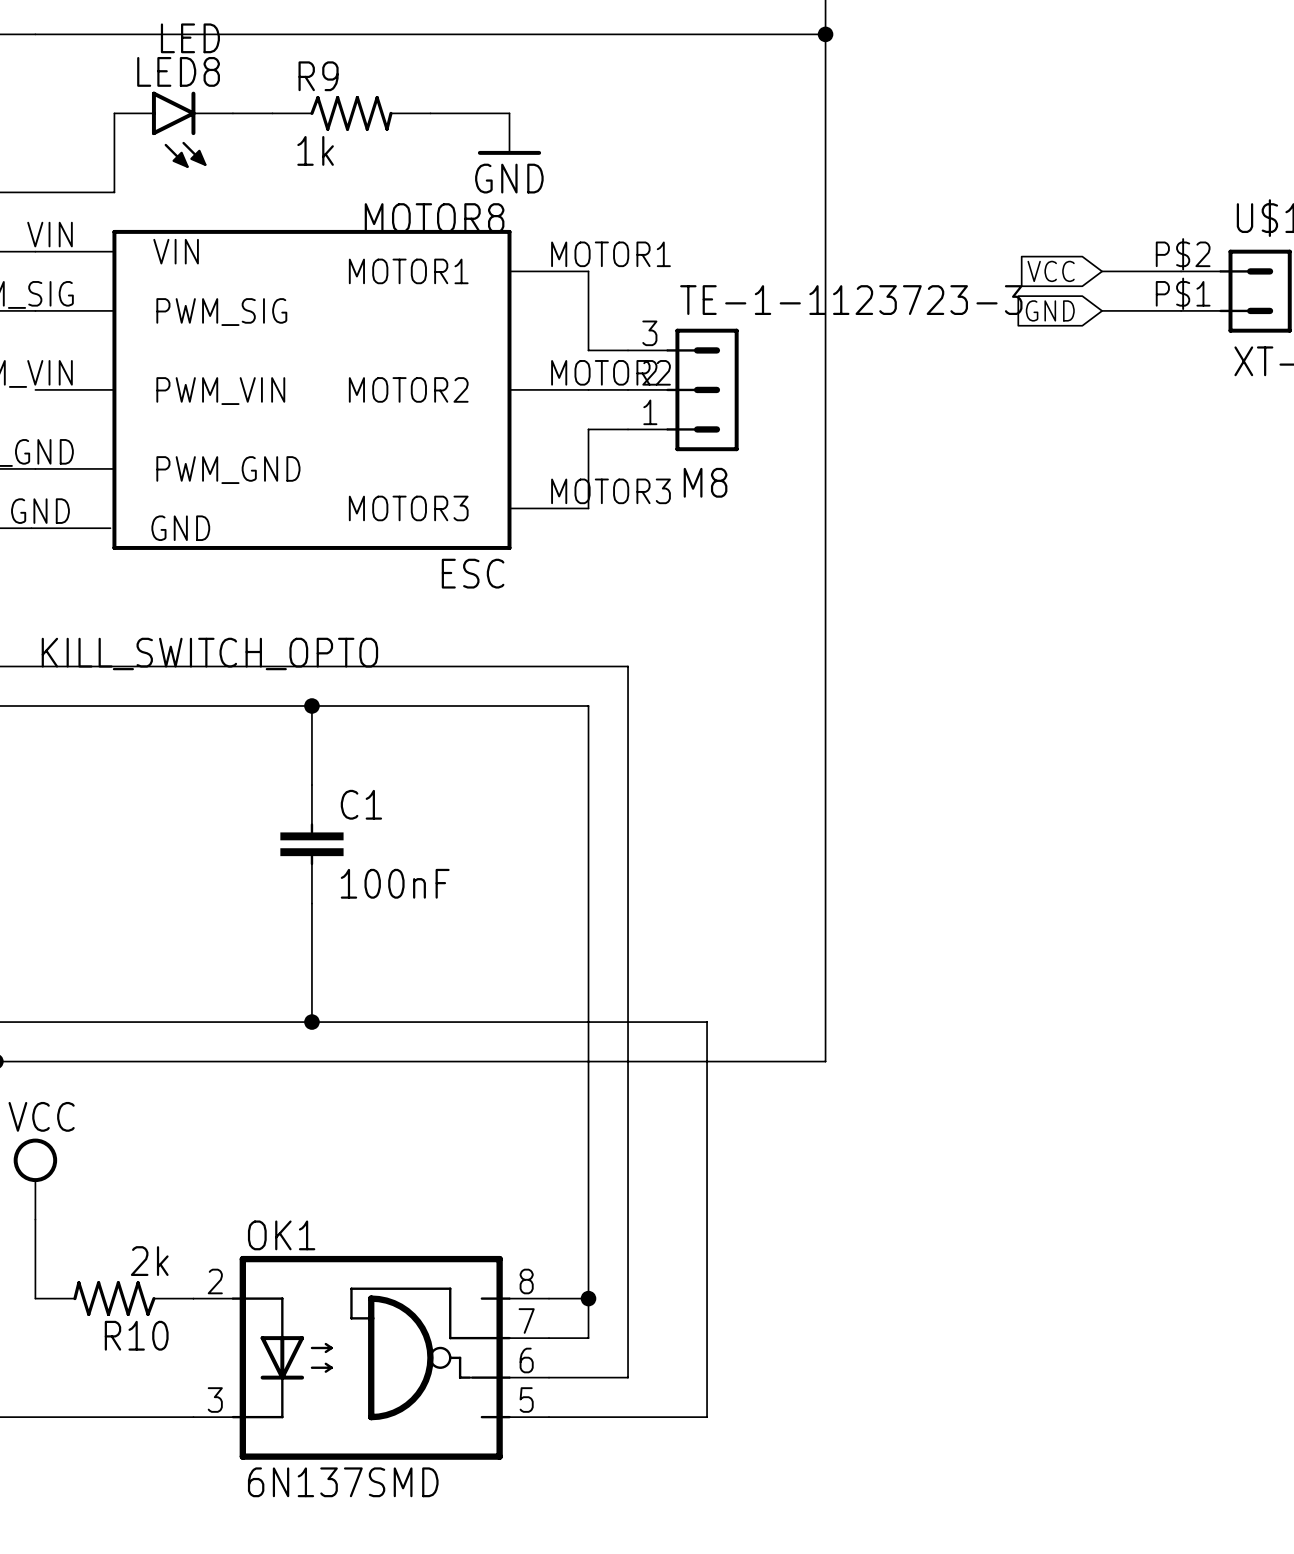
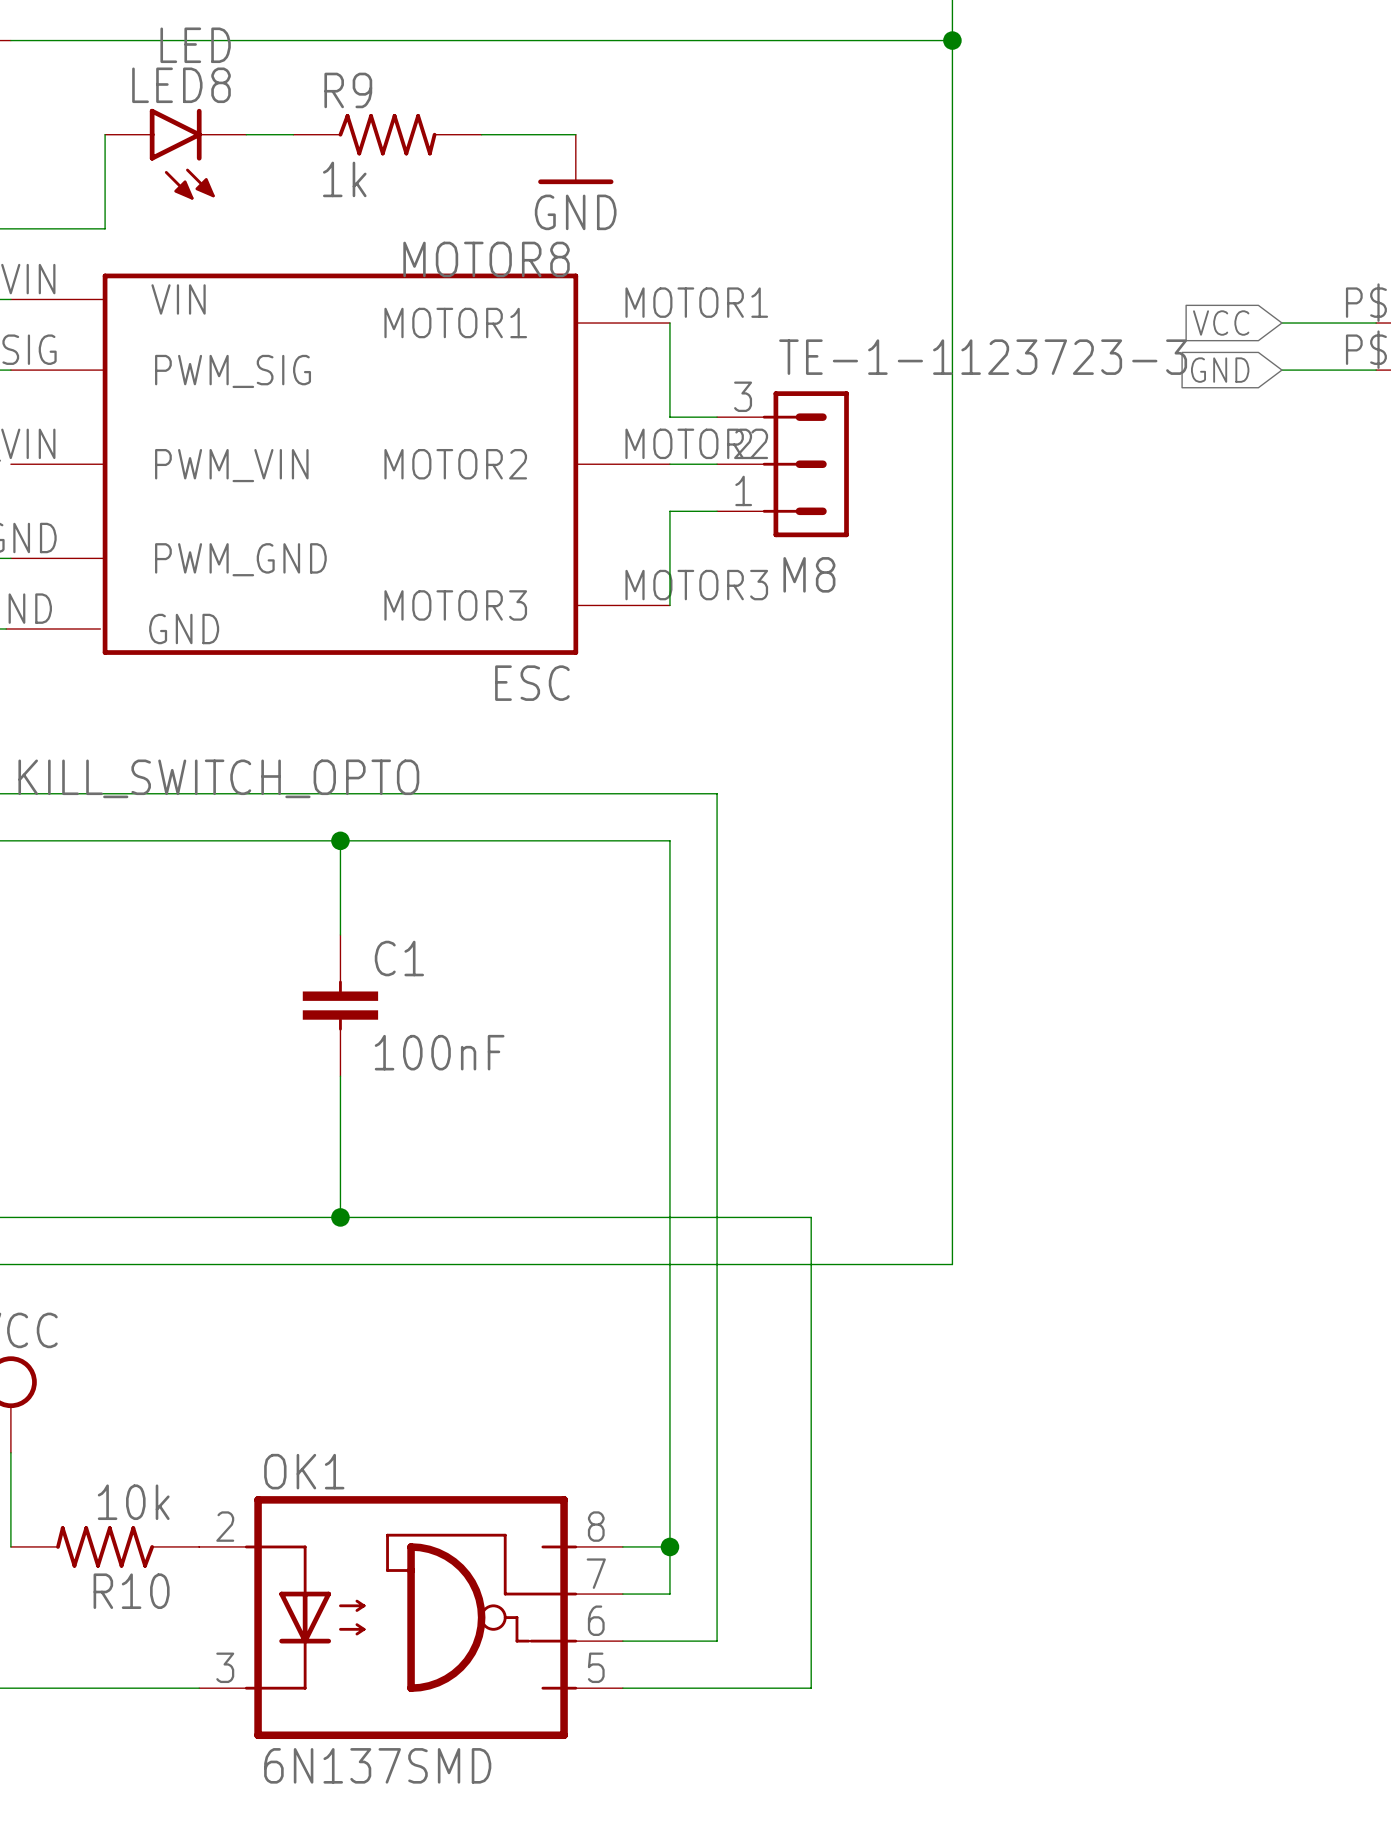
R10 value: 2k (149, 1261) -> 10k (133, 1502)

